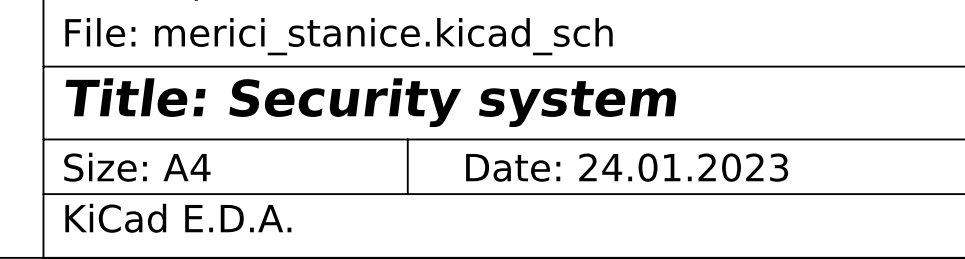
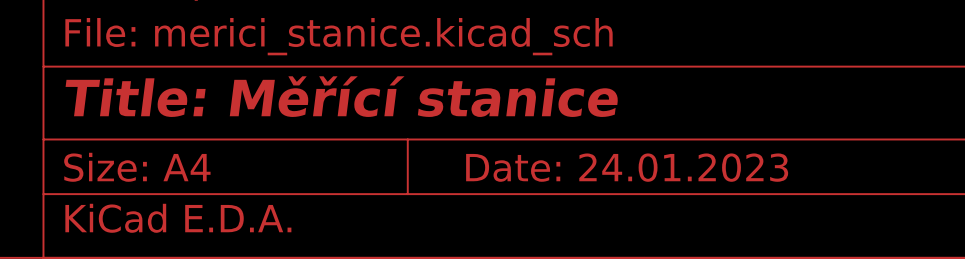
title block: Title: Security system (371, 102) -> Title: Měřící stanice (342, 96)

